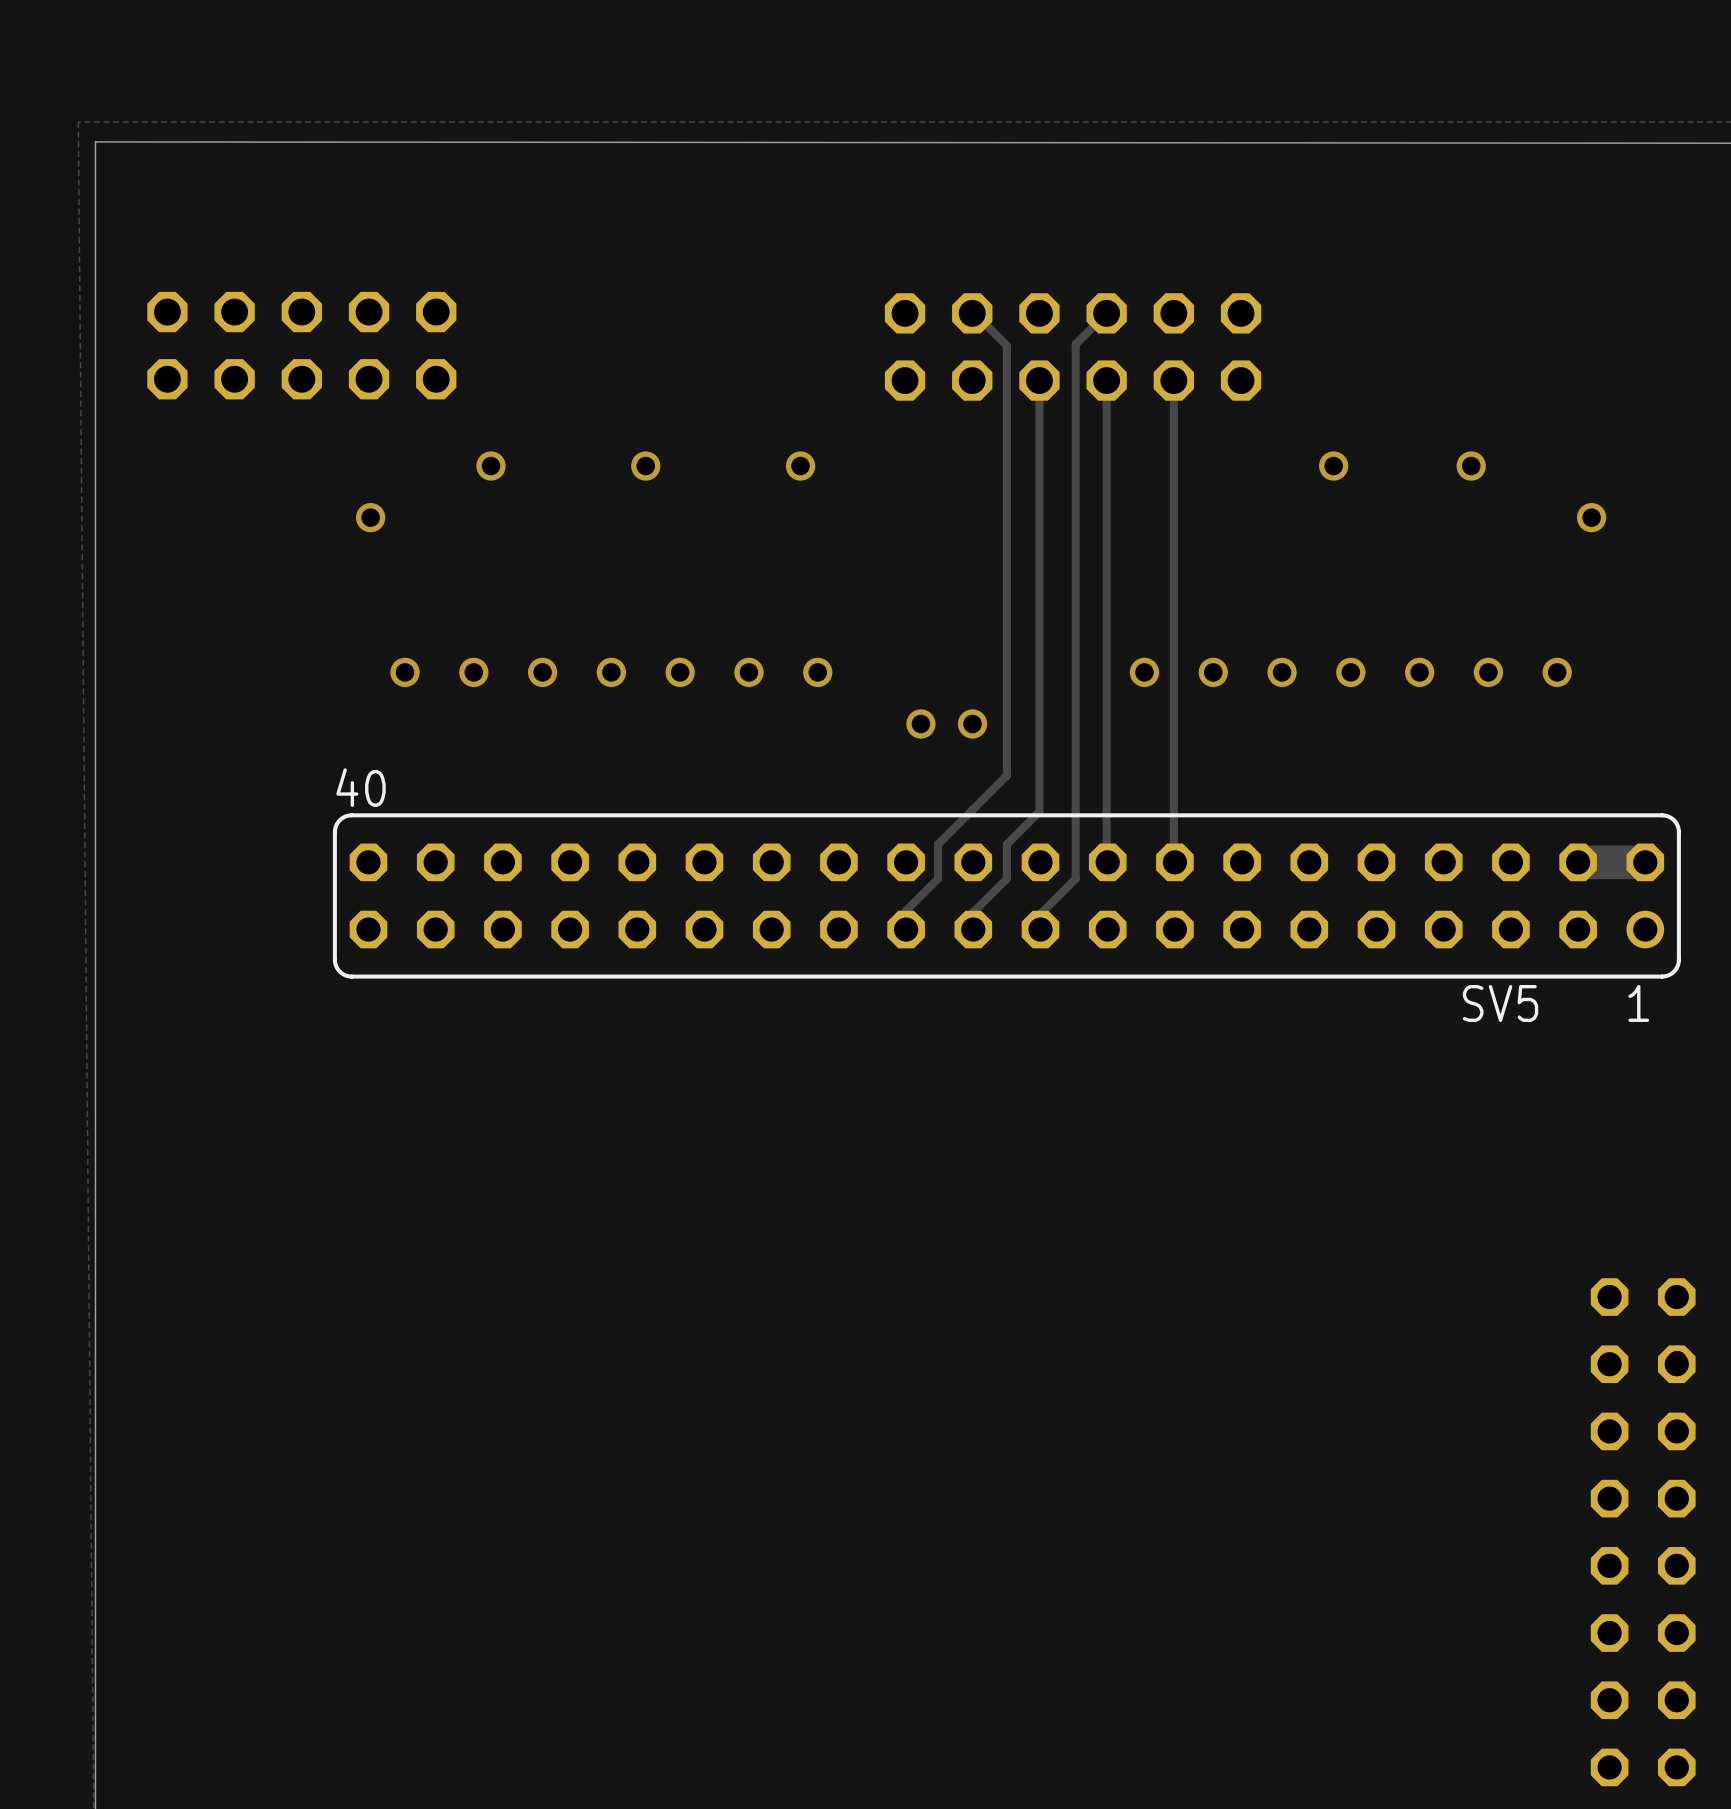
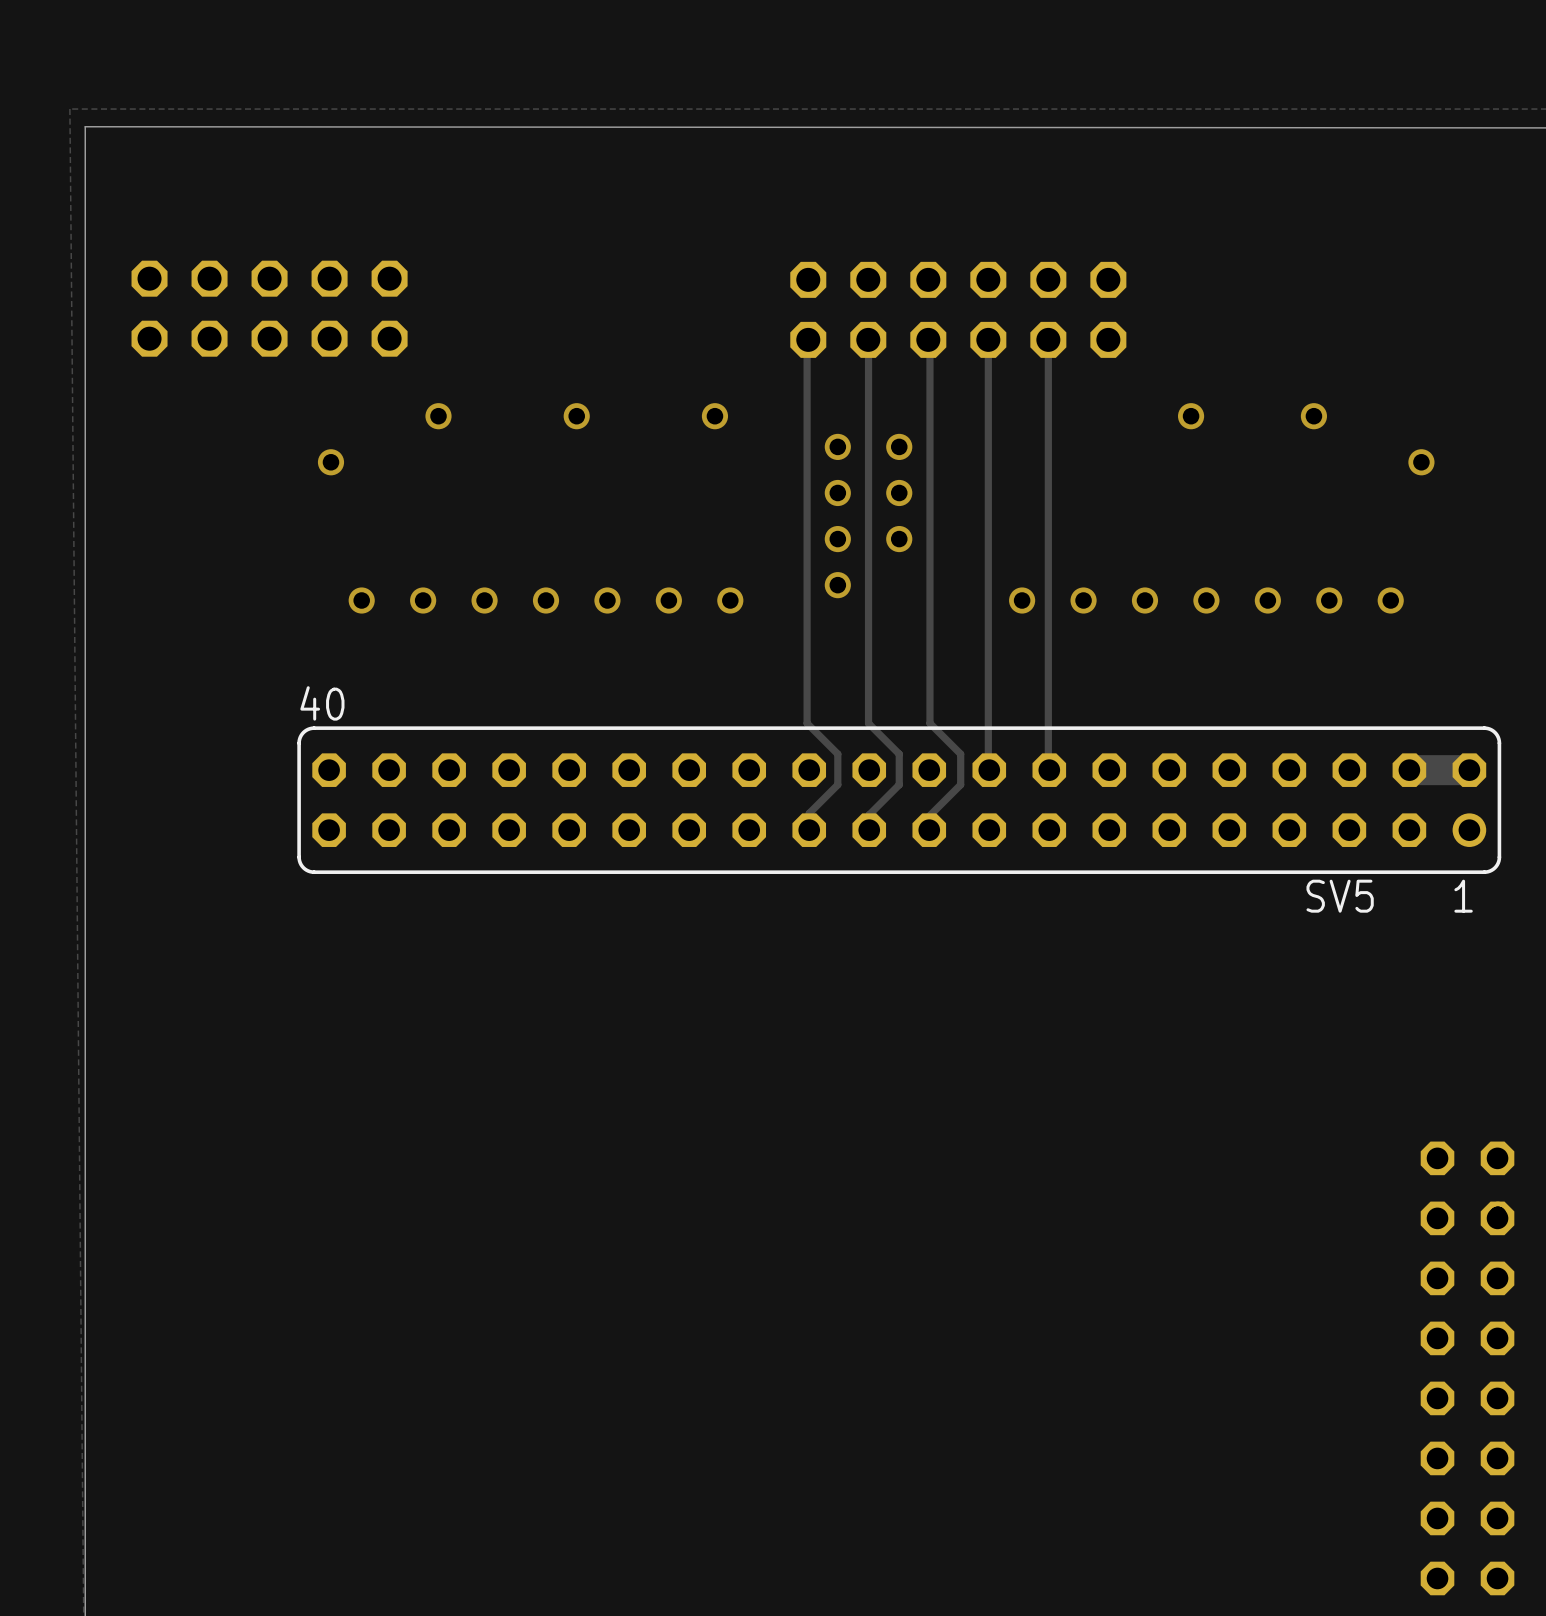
track: (972, 313) (974, 313) (1006, 345) (1006, 775) (938, 844) -> (808, 339) (807, 723) (837, 754)
track: (1106, 313) (1075, 344) (1075, 844) -> (928, 339) (929, 341) (929, 723) (960, 754)
track: (1039, 380) (1039, 811) (1006, 844) -> (868, 340) (868, 723) (899, 754)
via: none -> (837, 446)
via: none -> (899, 446)
via: none -> (837, 492)
via: none -> (899, 492)
via: none -> (837, 539)
via: none -> (899, 539)
via: none -> (837, 585)
via: (920, 723) -> none
via: (972, 723) -> none

